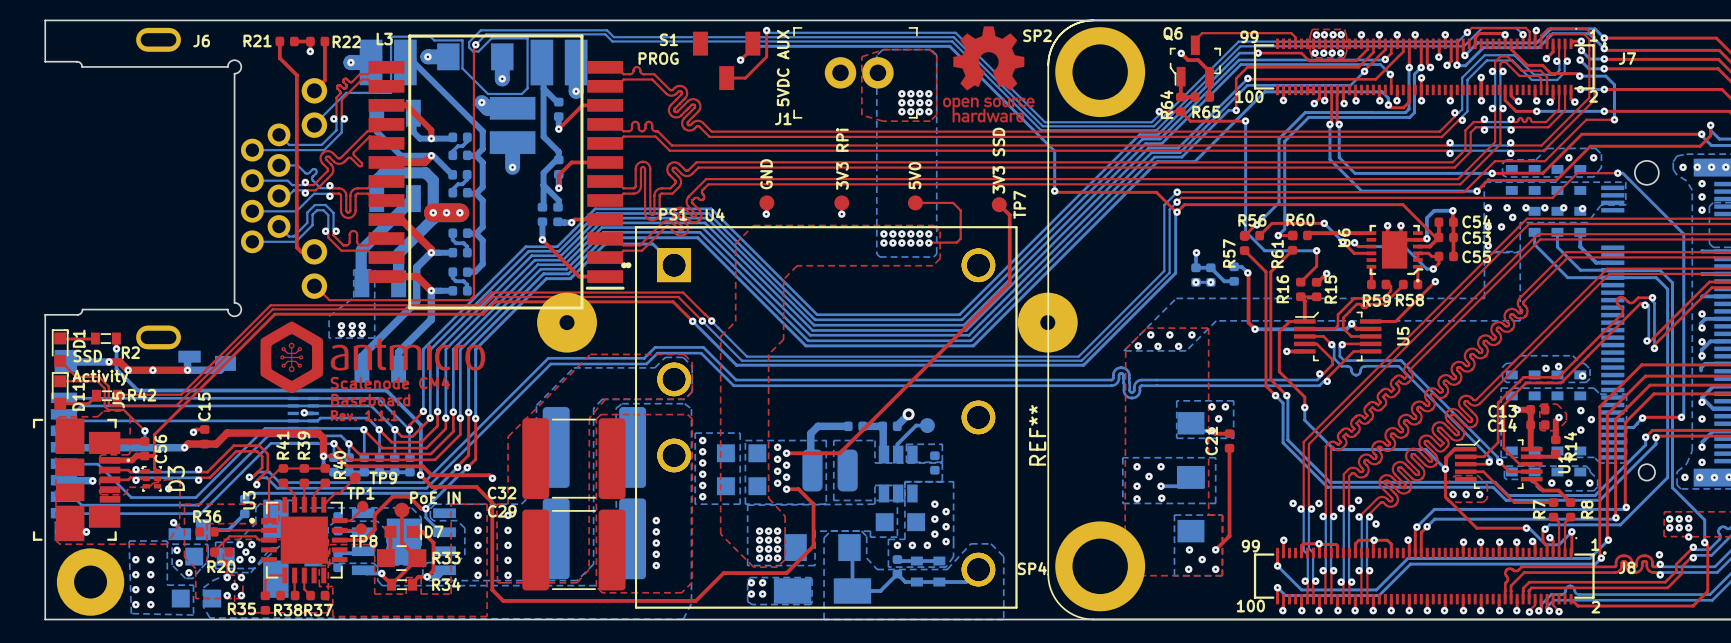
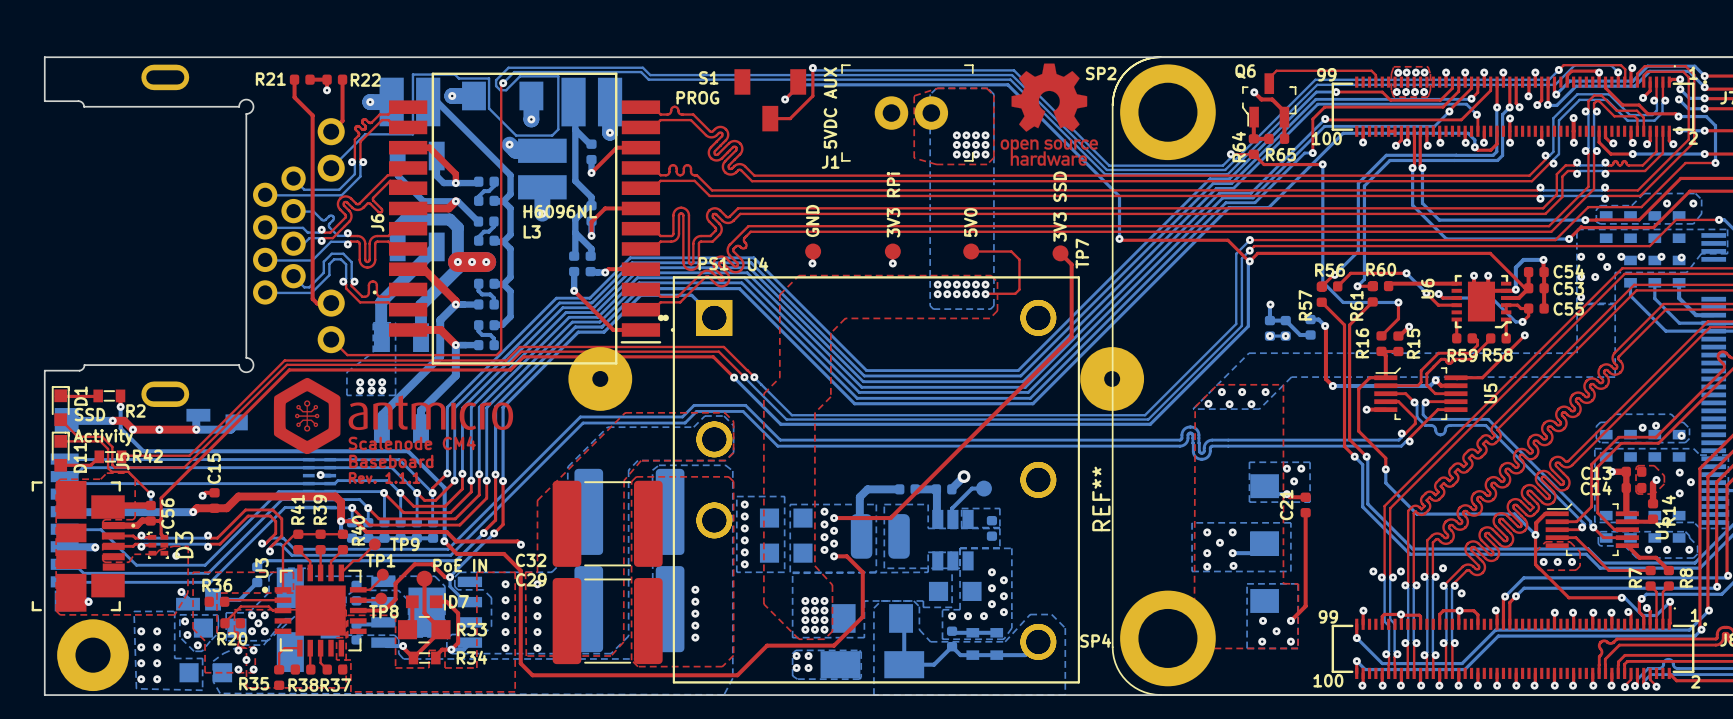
J6 footprint: [136, 27, 328, 350] -> [141, 64, 377, 407]
L3 footprint: [368, 34, 625, 310] -> [389, 72, 675, 365]
L3 name position: L3 (384, 39) -> L3 (532, 231)
J6 name position: J6 (201, 41) -> J6 (377, 222)
L3 value: none -> H6096NL (560, 211)

